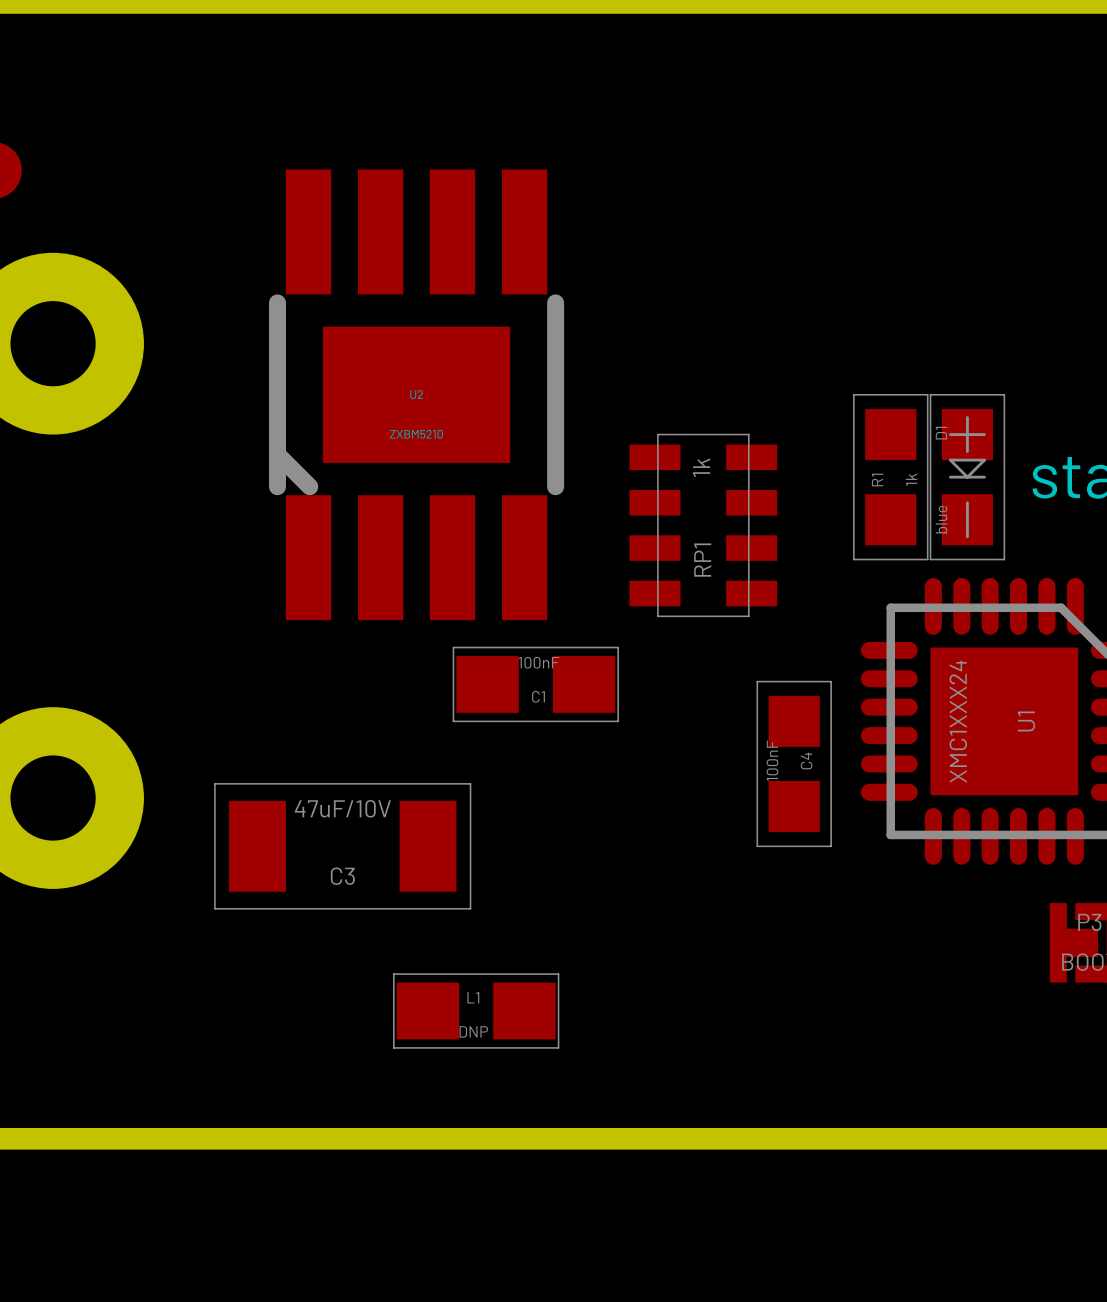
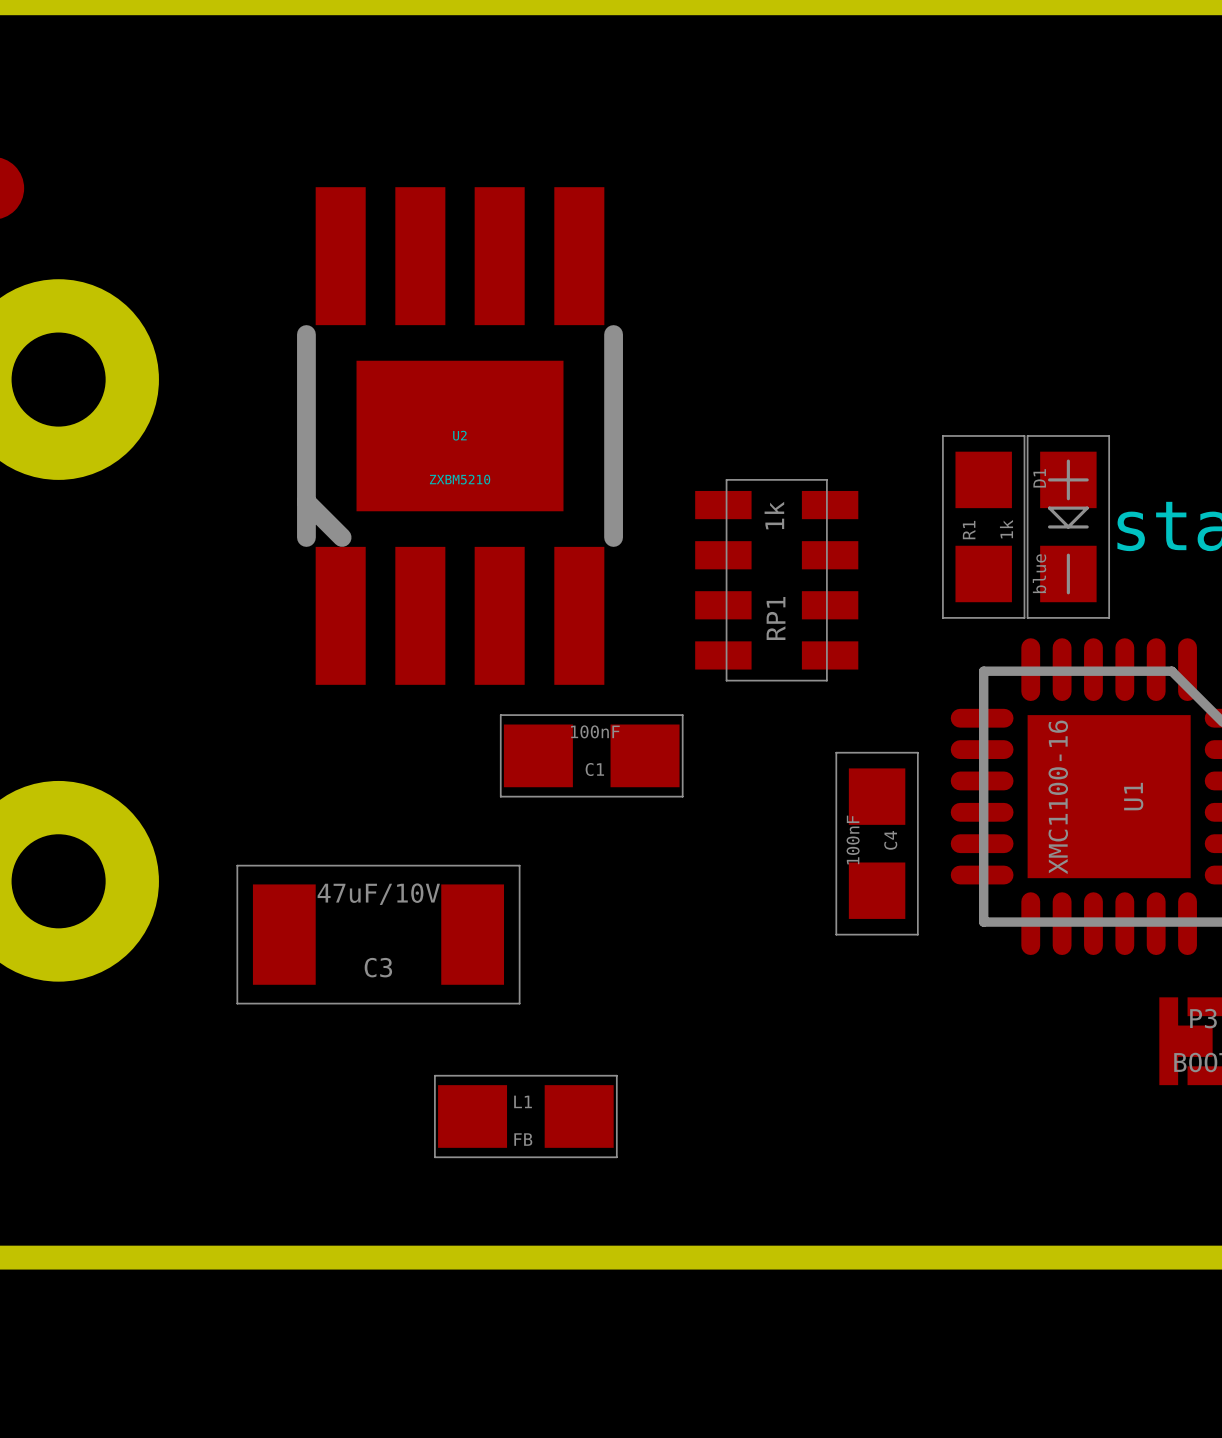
U1 value: XMC1XXX24 (958, 721) -> XMC1100-16 (1058, 797)
L1 value: DNP (473, 1031) -> FB (523, 1139)

